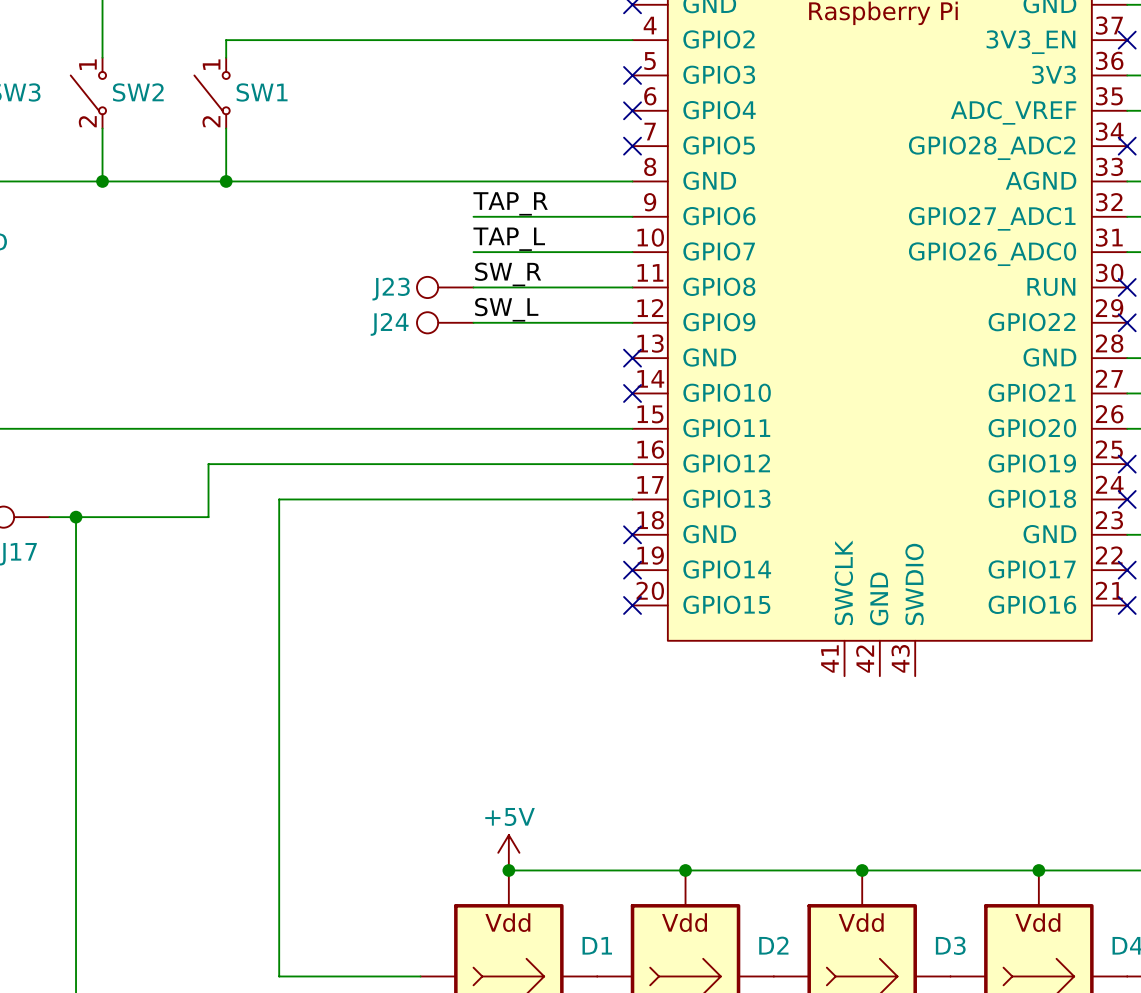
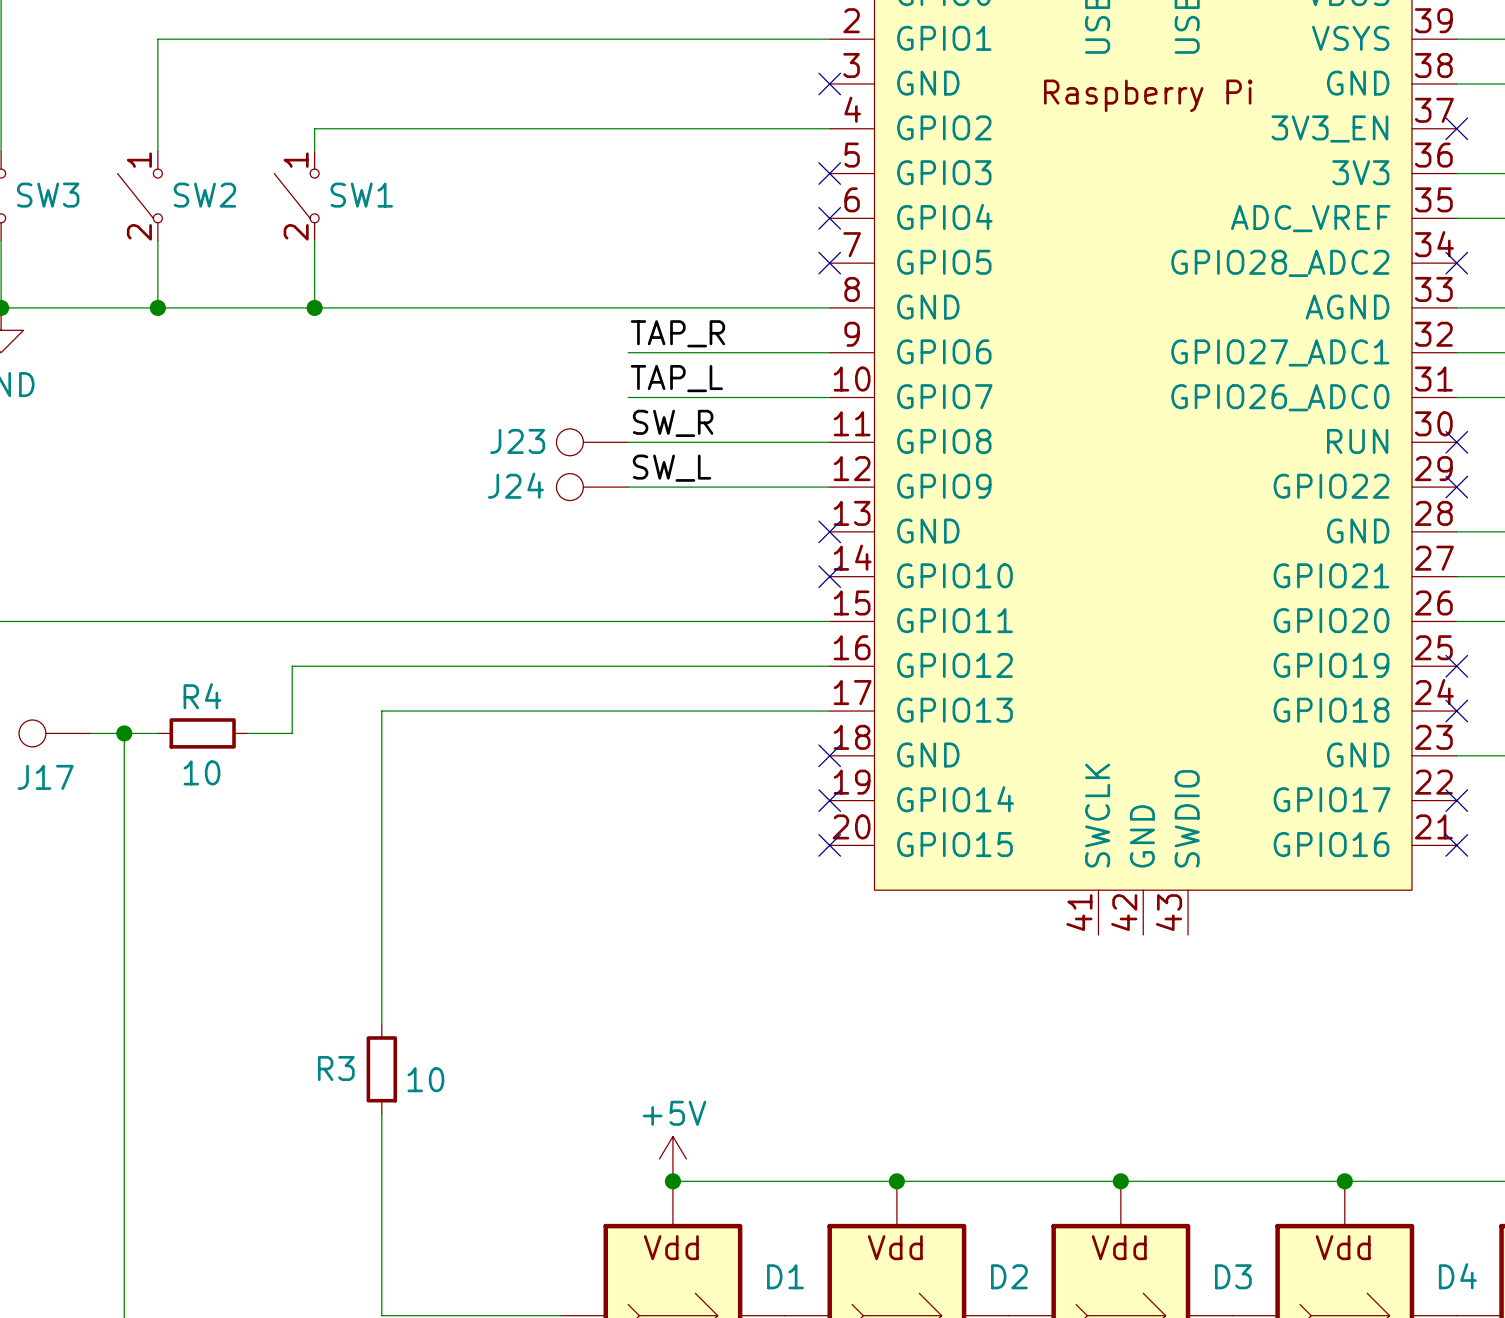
wire: (102, 517) (173, 517) -> none
R4: none -> 10 (202, 733)
wire: (279, 746) (279, 817) -> none
R3: none -> 10 (381, 1069)

